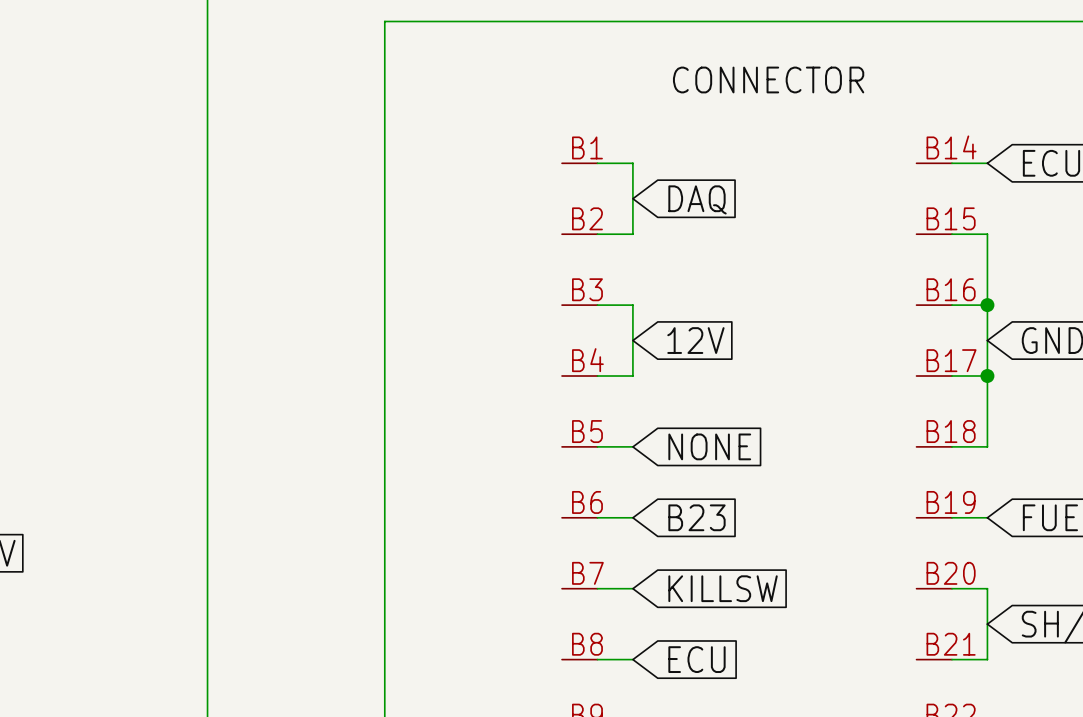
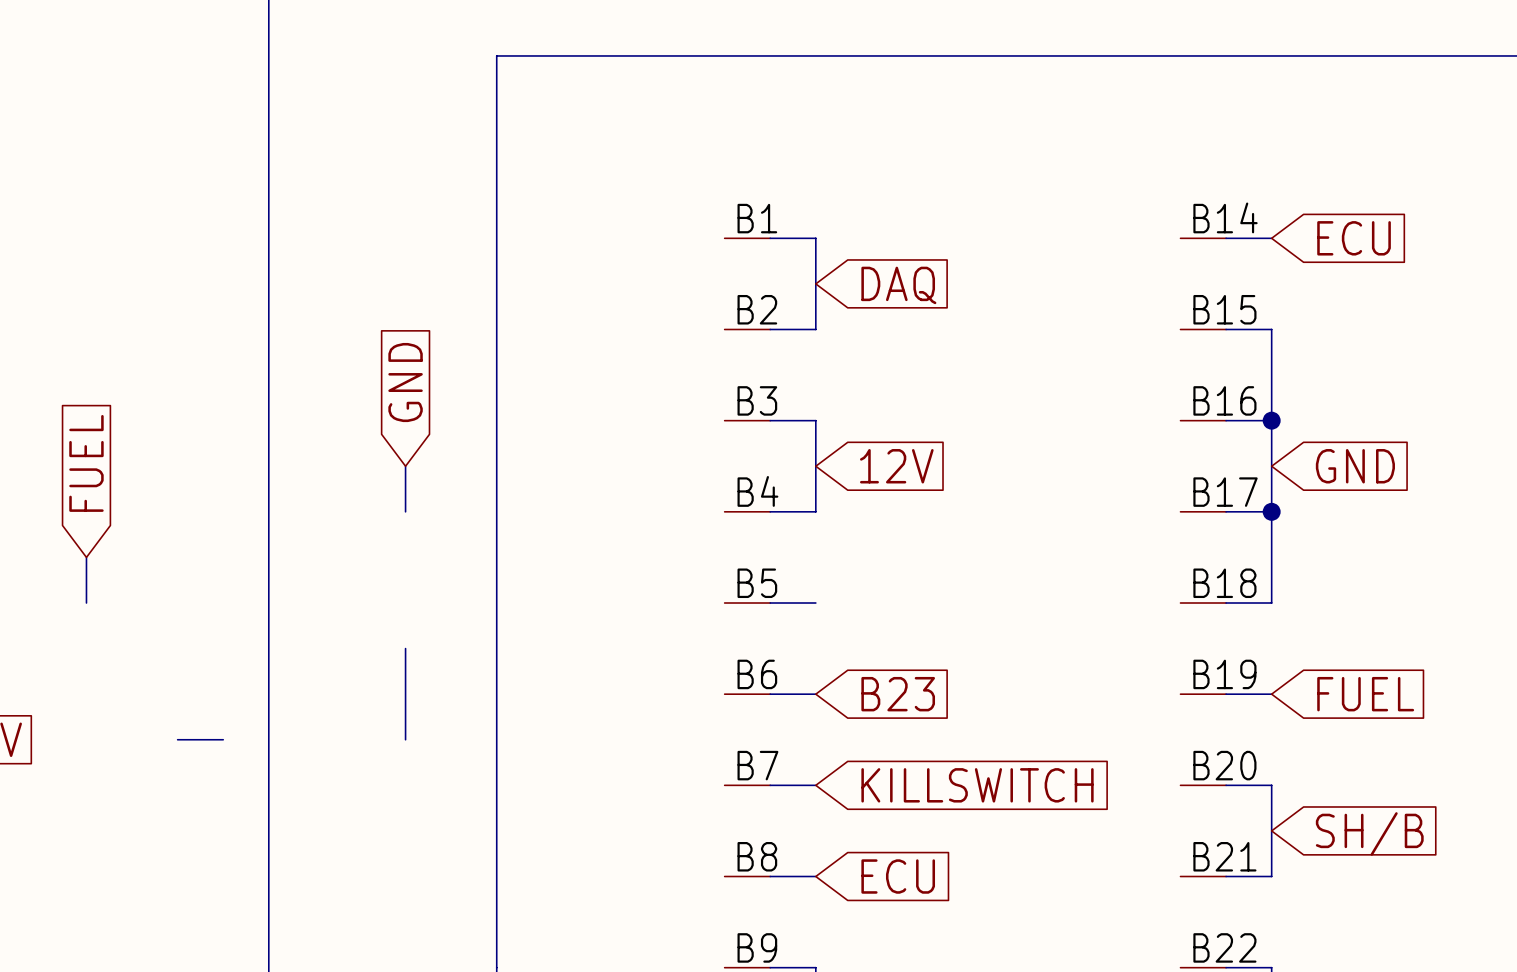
label: CONNECTOR (768, 79) -> none
global label: none -> GND (405, 382)
global label: none -> FUEL (86, 463)
wire: none -> (405, 466) (405, 511)
wire: none -> (86, 557) (86, 603)
global label: NONE (709, 446) -> none
wire: none -> (405, 648) (405, 739)
wire: none -> (177, 739) (223, 739)
global label: KILLSW (723, 588) -> KILLSWITCH (977, 785)

